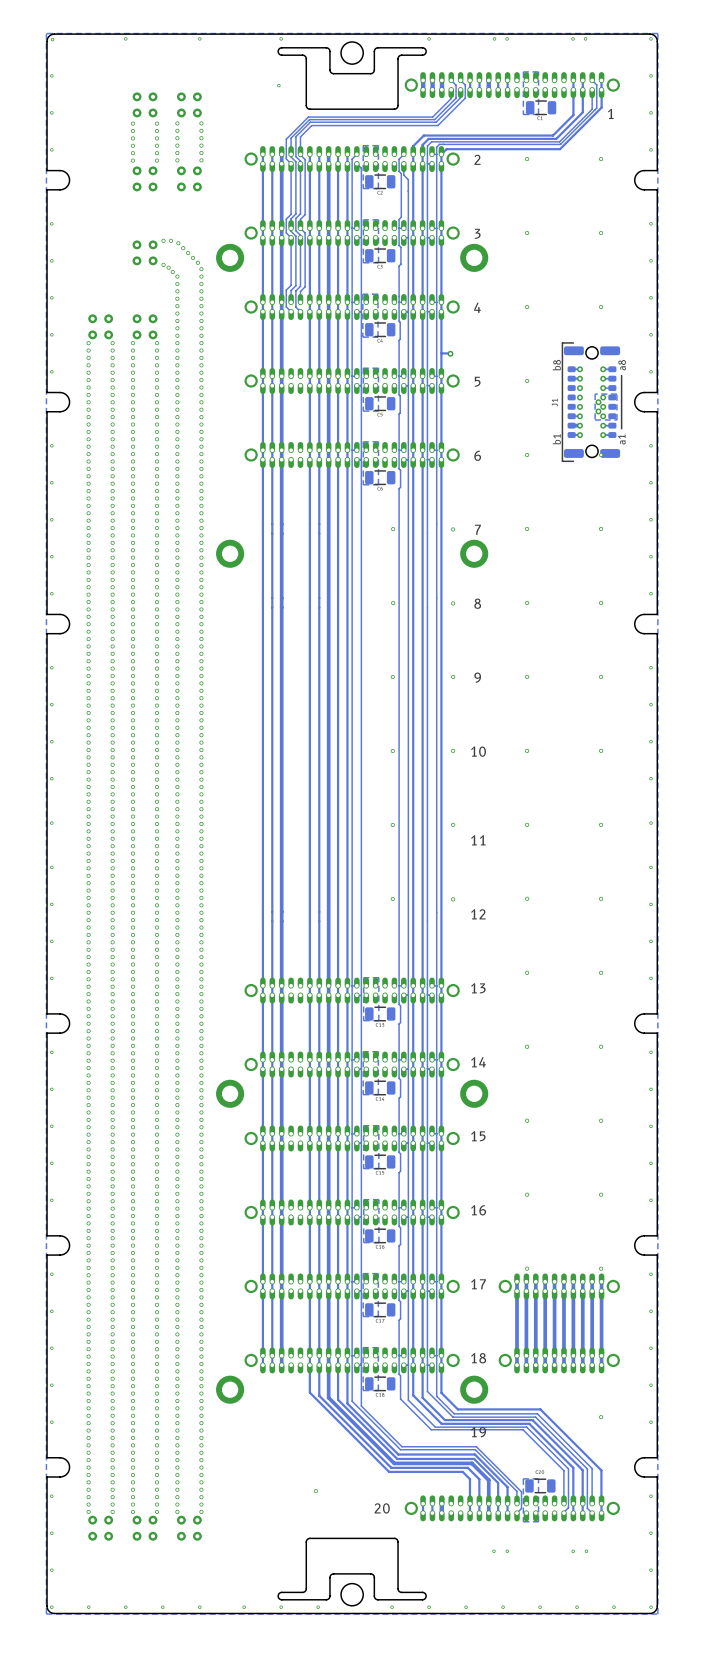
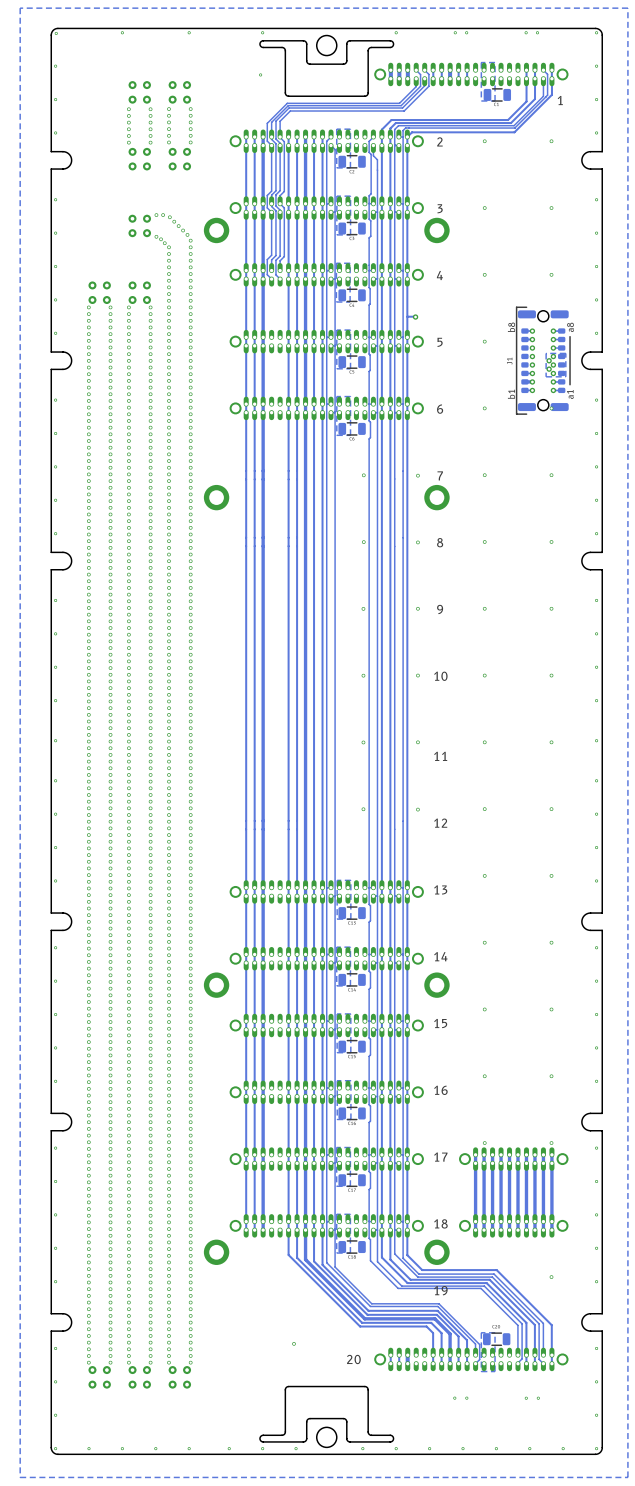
zone outline: (657, 33) (657, 1614) (46, 1614) (46, 33) (657, 33) -> (627, 8) (627, 1477) (20, 1477) (20, 8) (627, 8)

